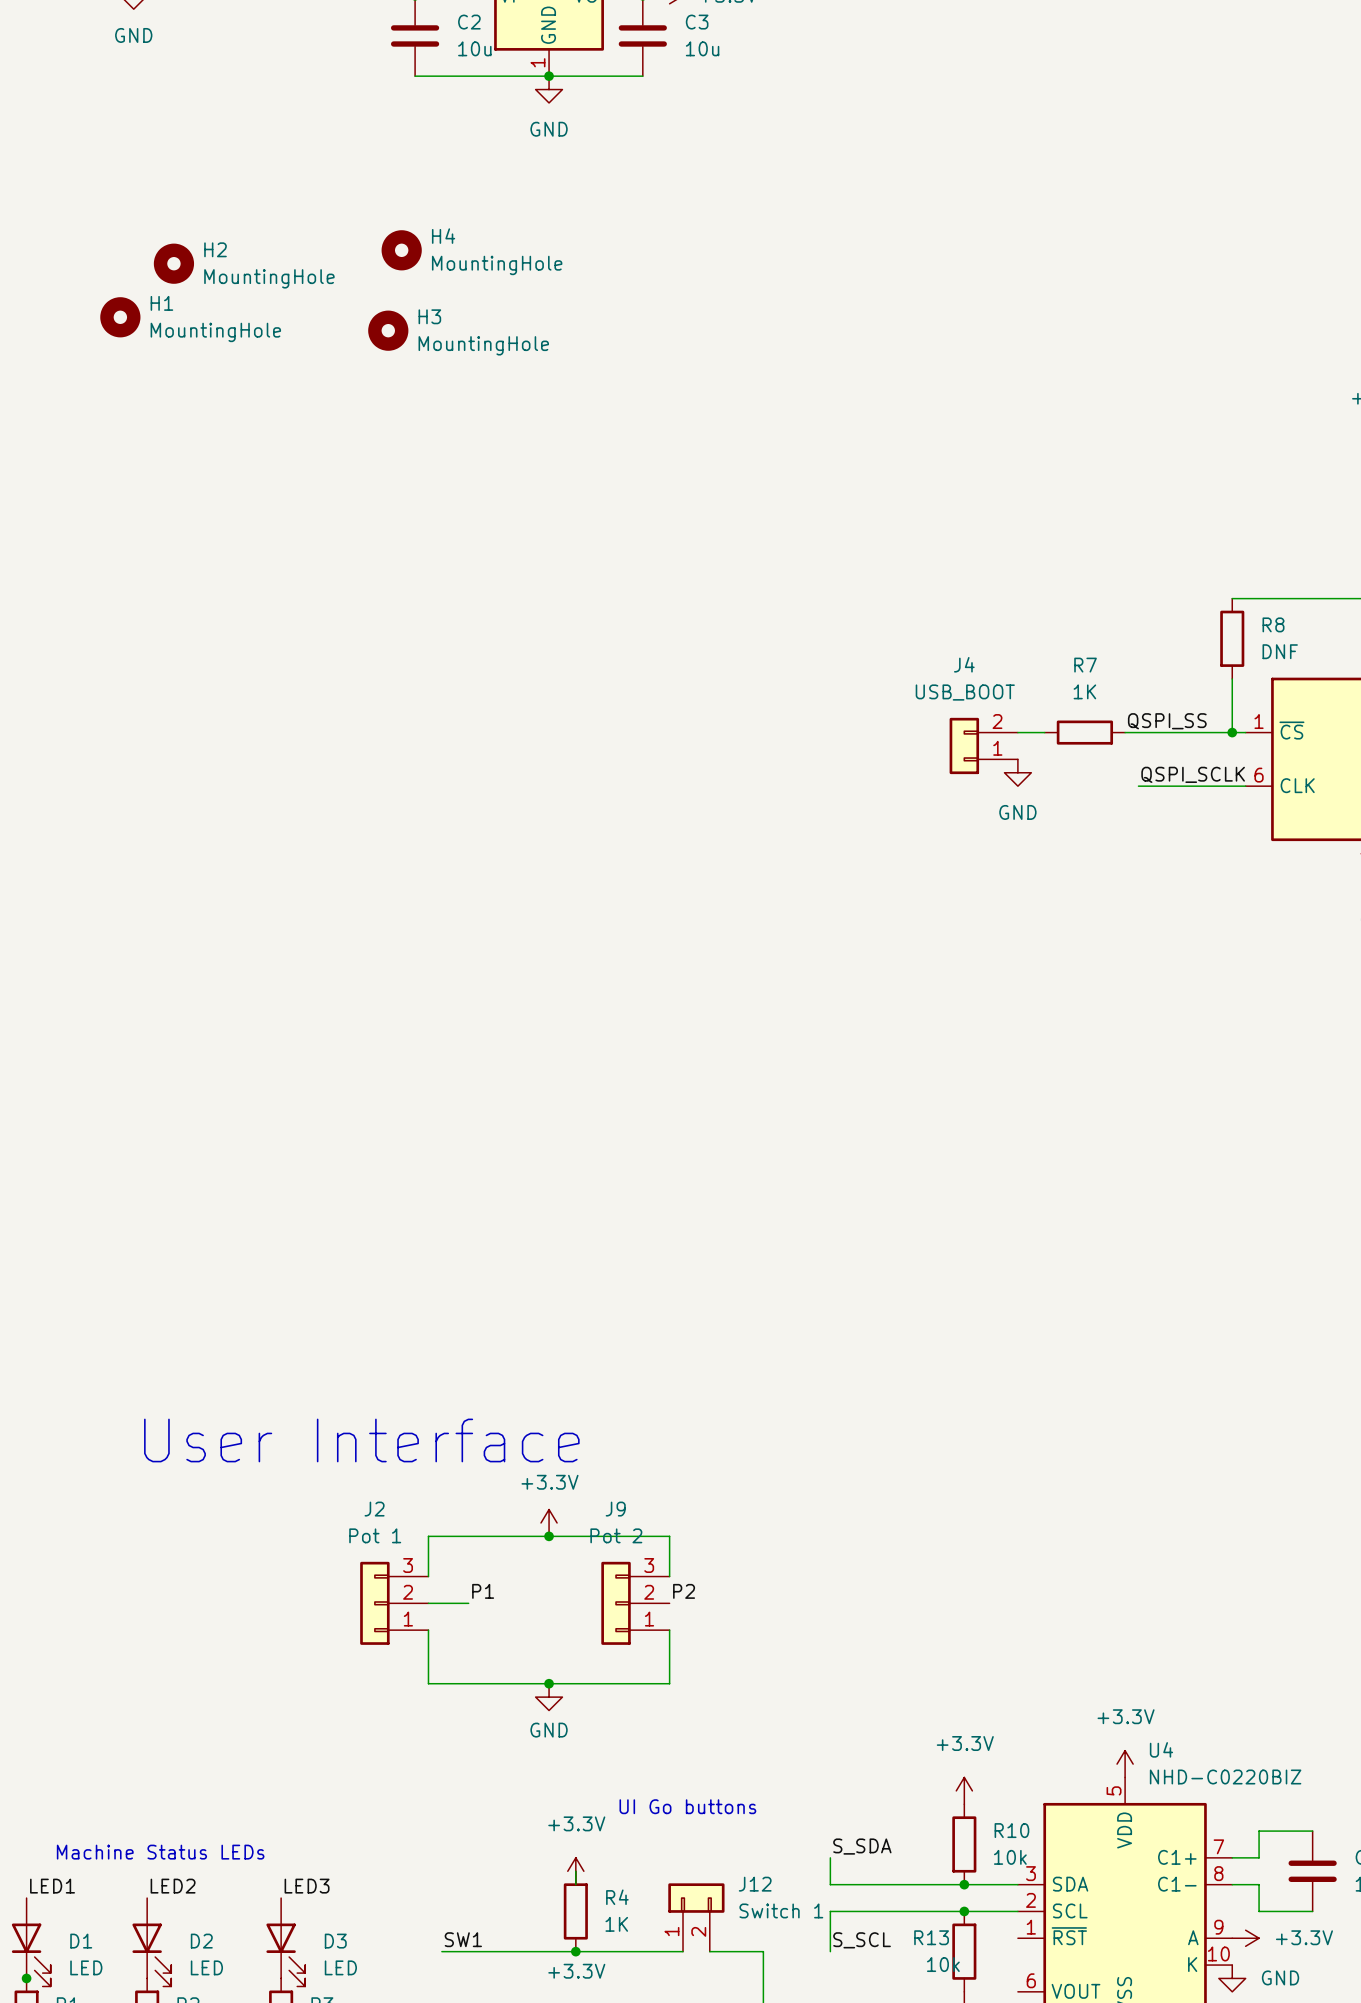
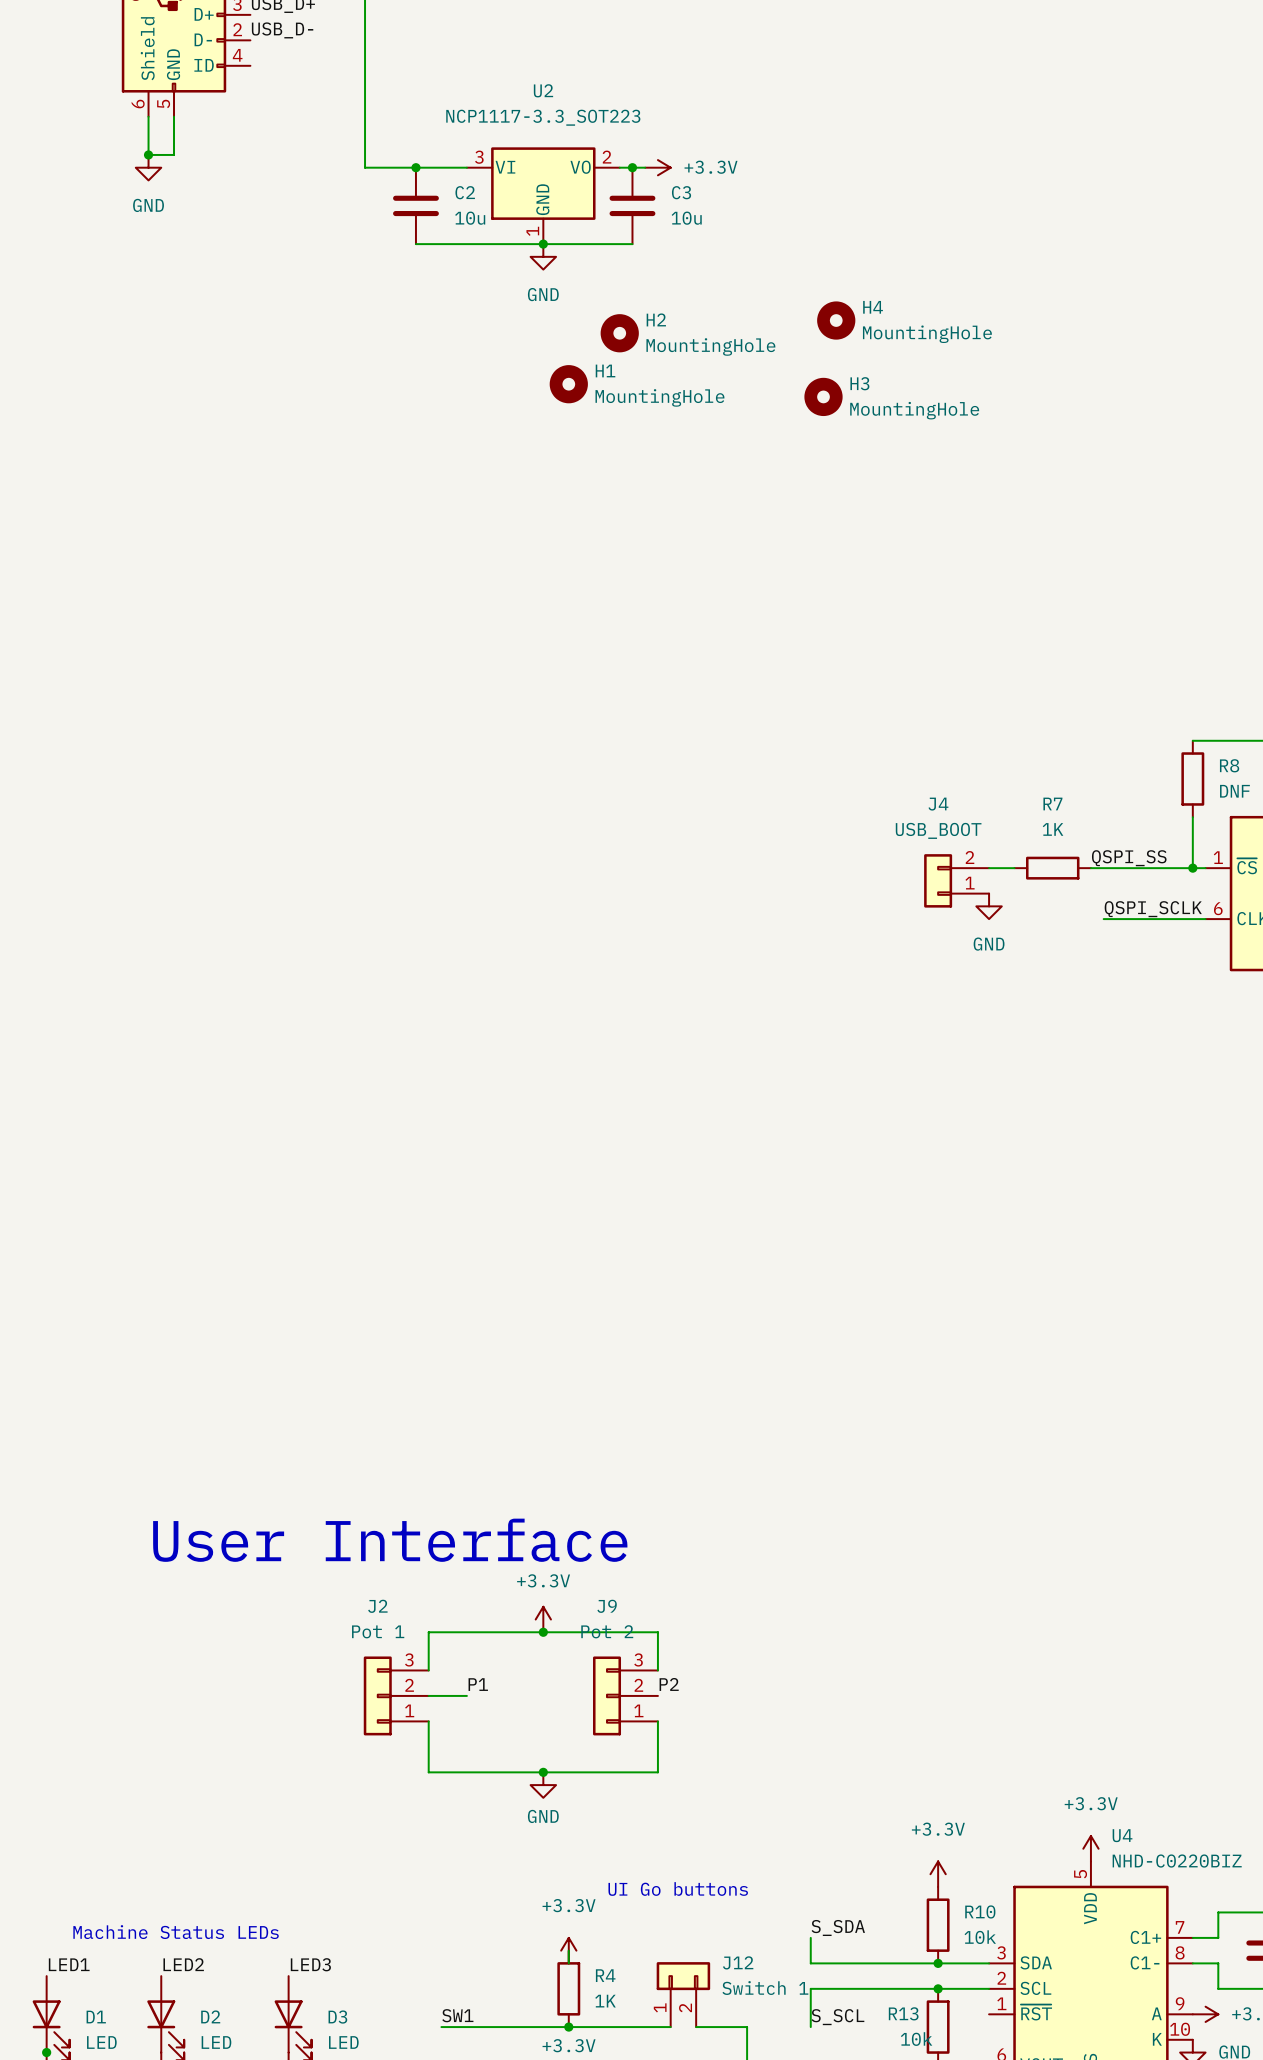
H4 position: (401, 250) -> (836, 320)
H2 position: (173, 263) -> (619, 333)
H1 position: (120, 317) -> (568, 384)
H3 position: (388, 330) -> (823, 396)

